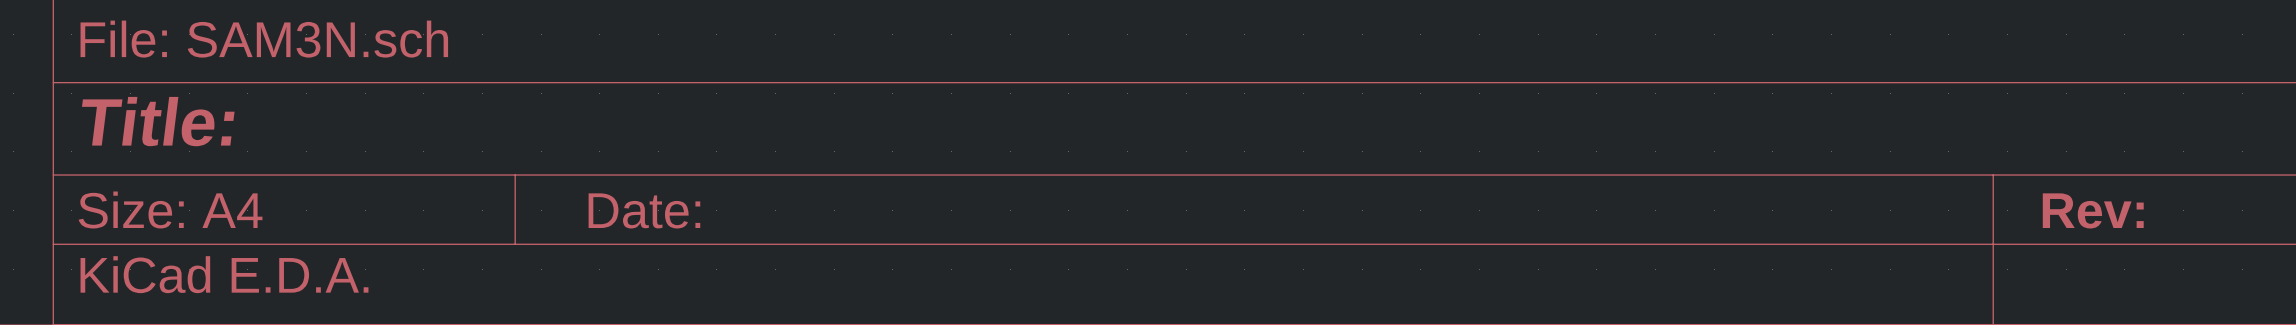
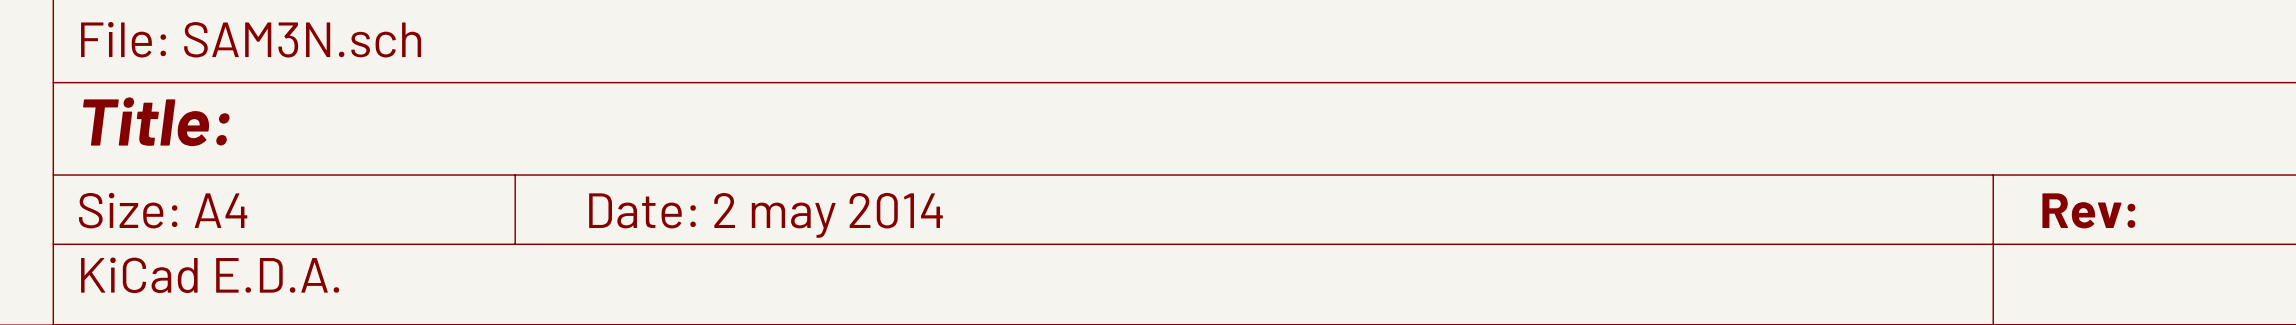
title block: Date: (644, 210) -> Date: 2 may 2014 (765, 215)

